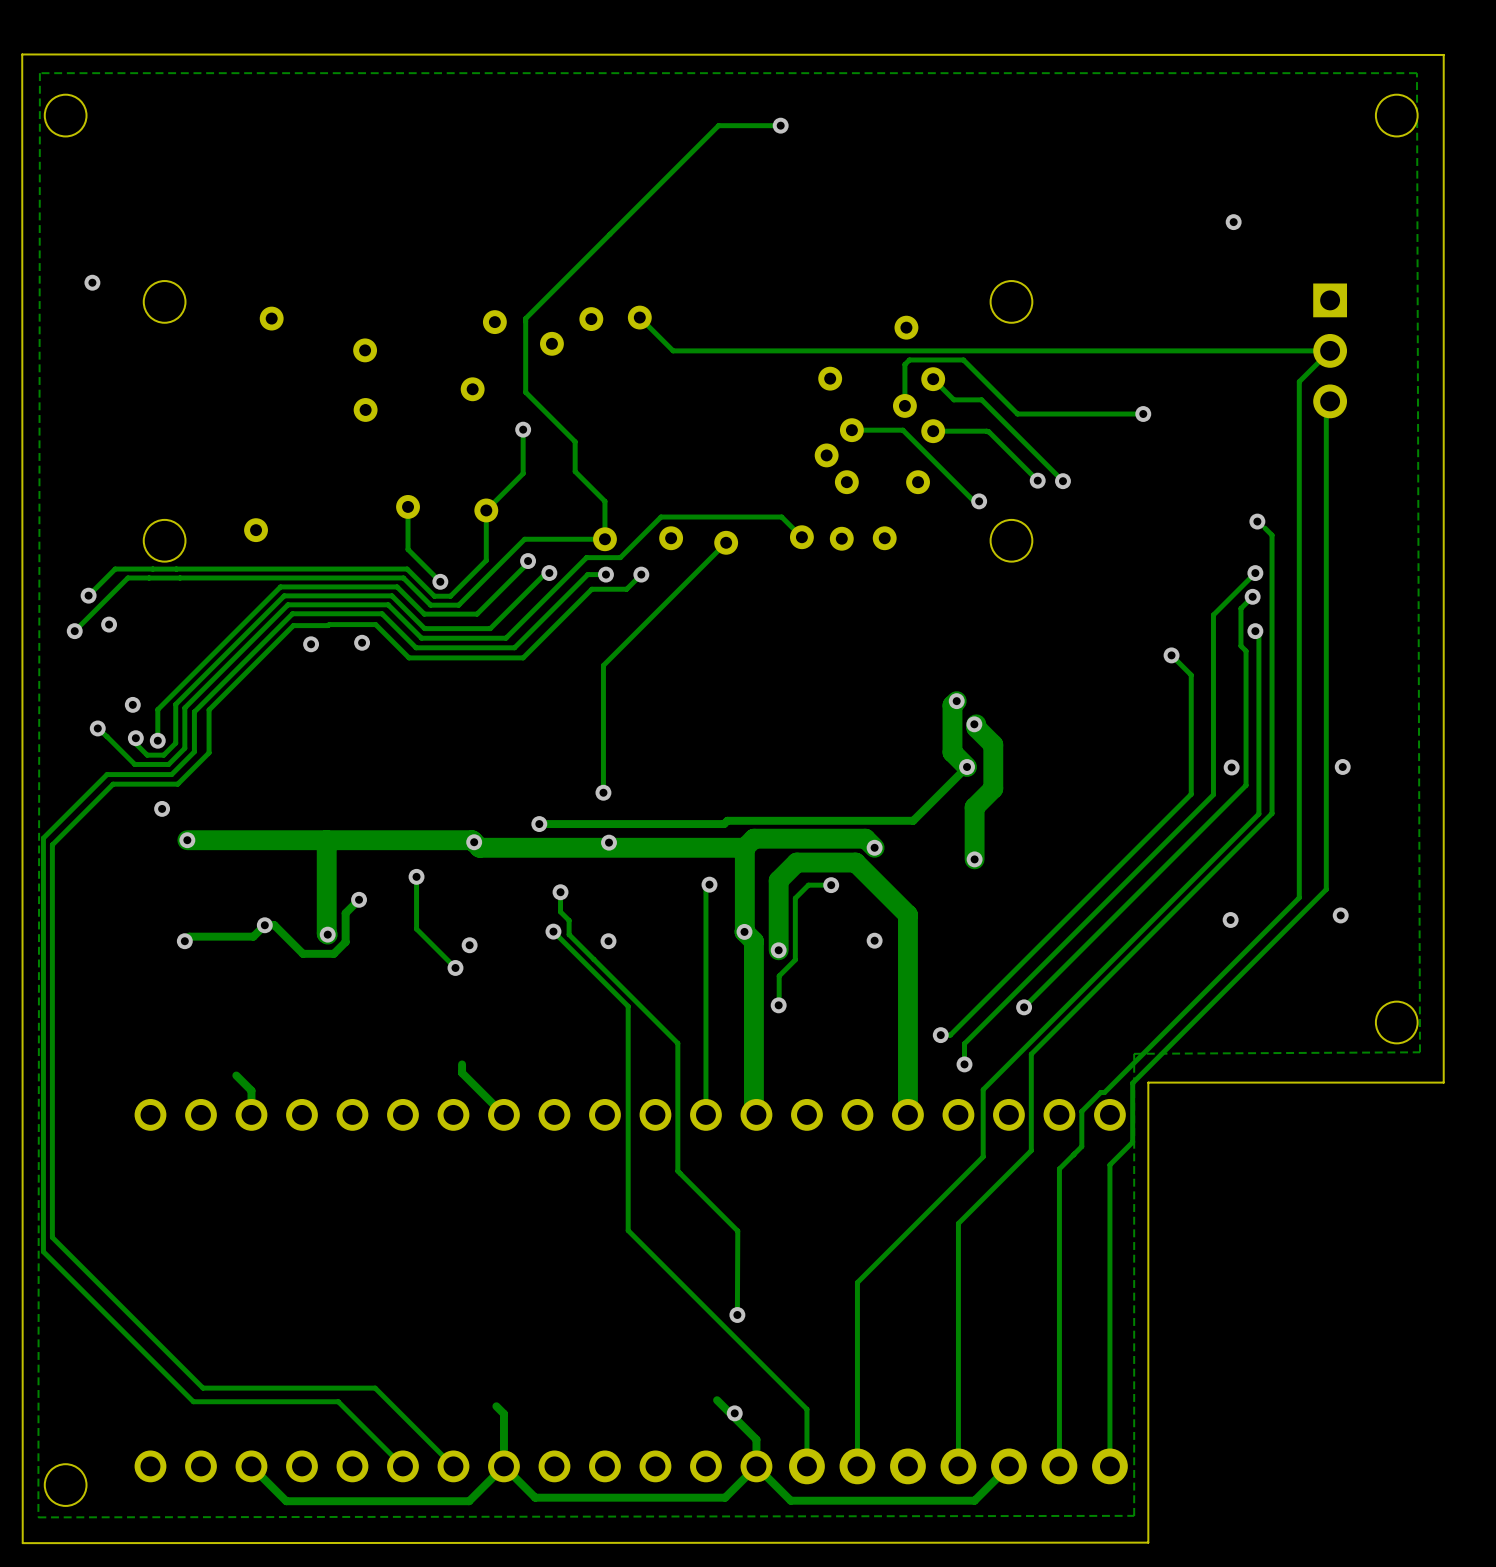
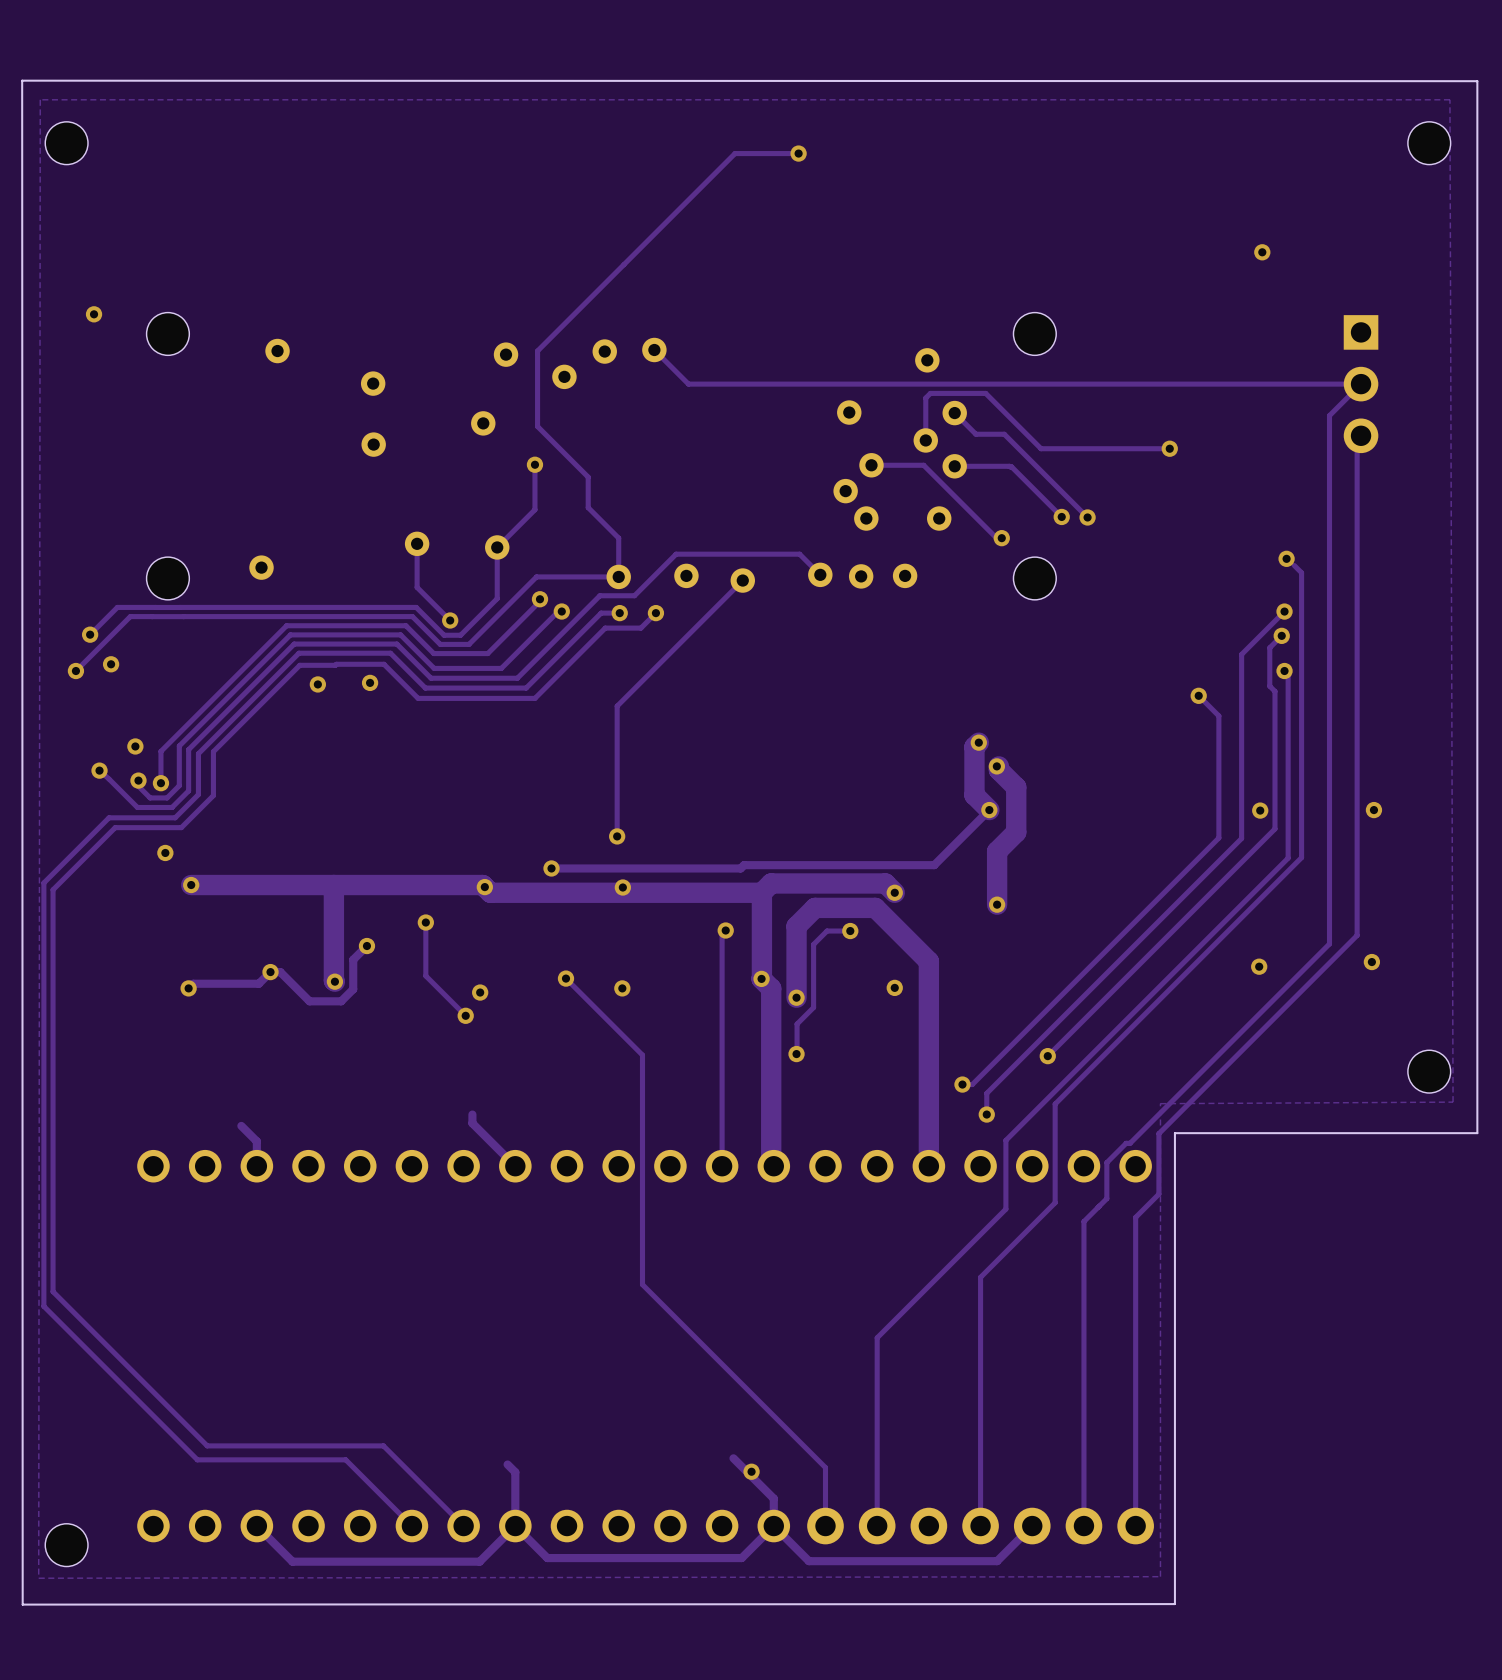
track: (560, 892) (560, 911) (569, 920) (569, 934) (677, 1043) (677, 1171) (737, 1231) (737, 1314) -> none
via: (560, 892) -> none
via: (737, 1314) -> none

